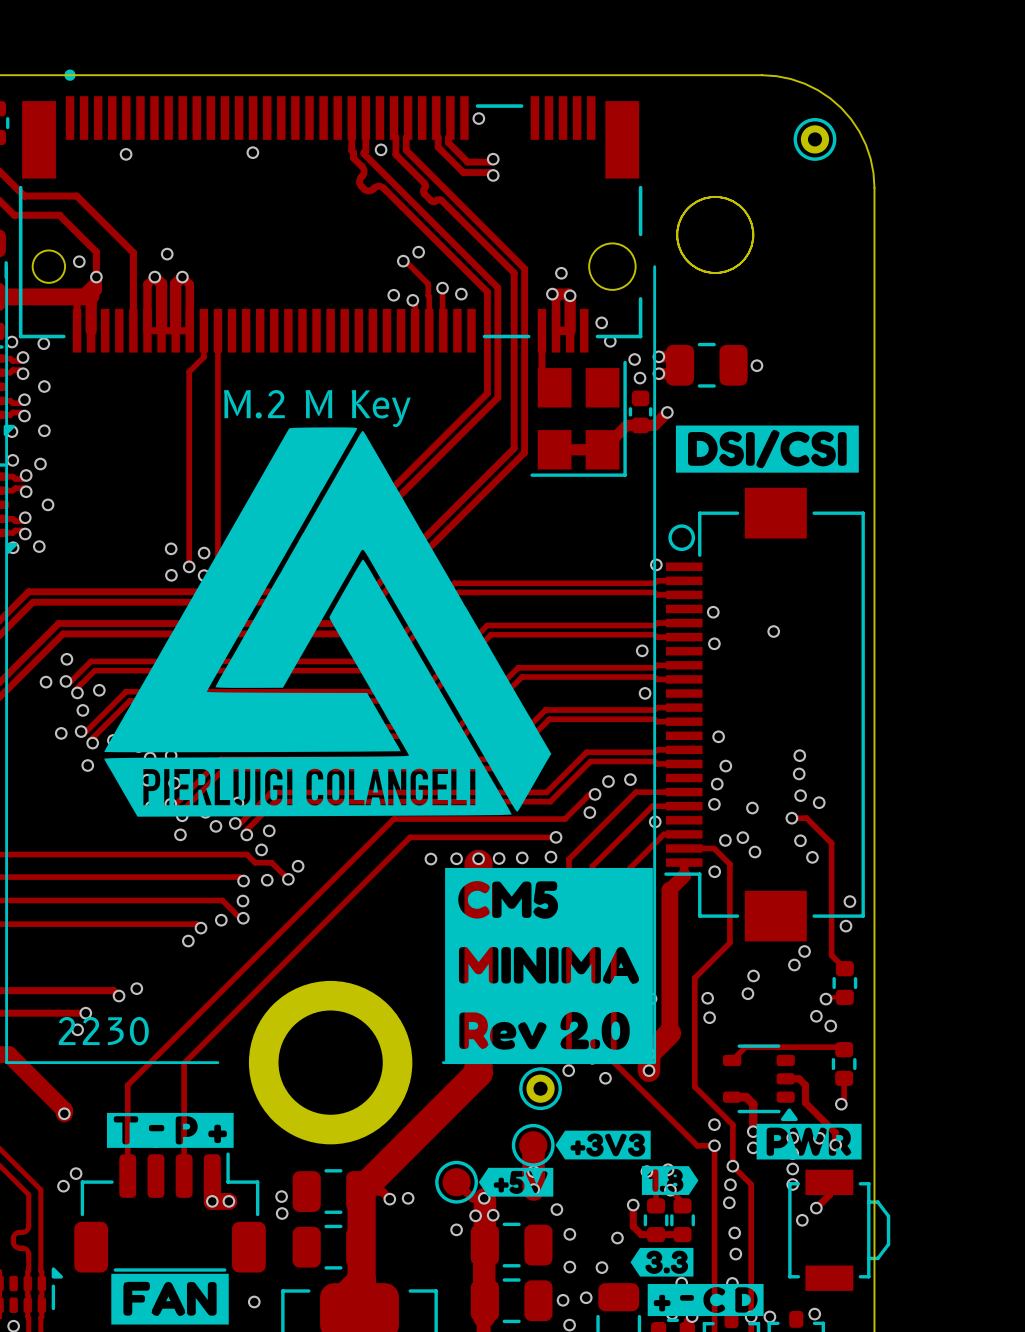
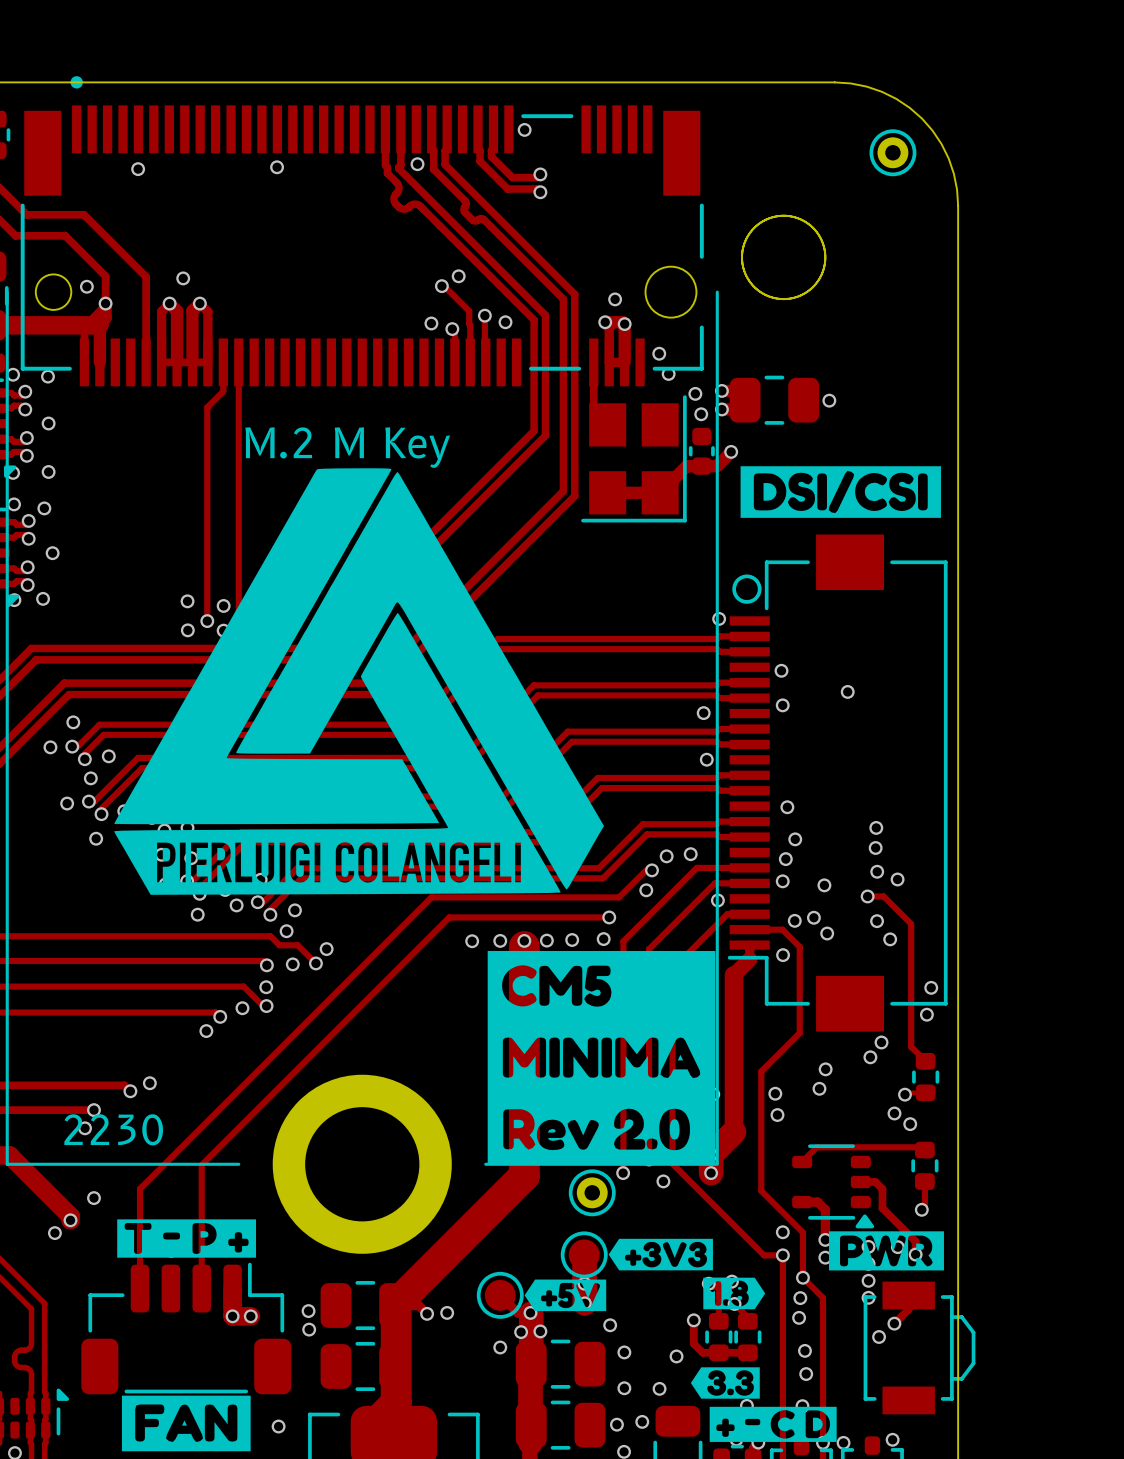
via: none -> (93, 1198)
via: none -> (54, 1233)
via: (76, 1173) -> none
via: (63, 1186) -> none

